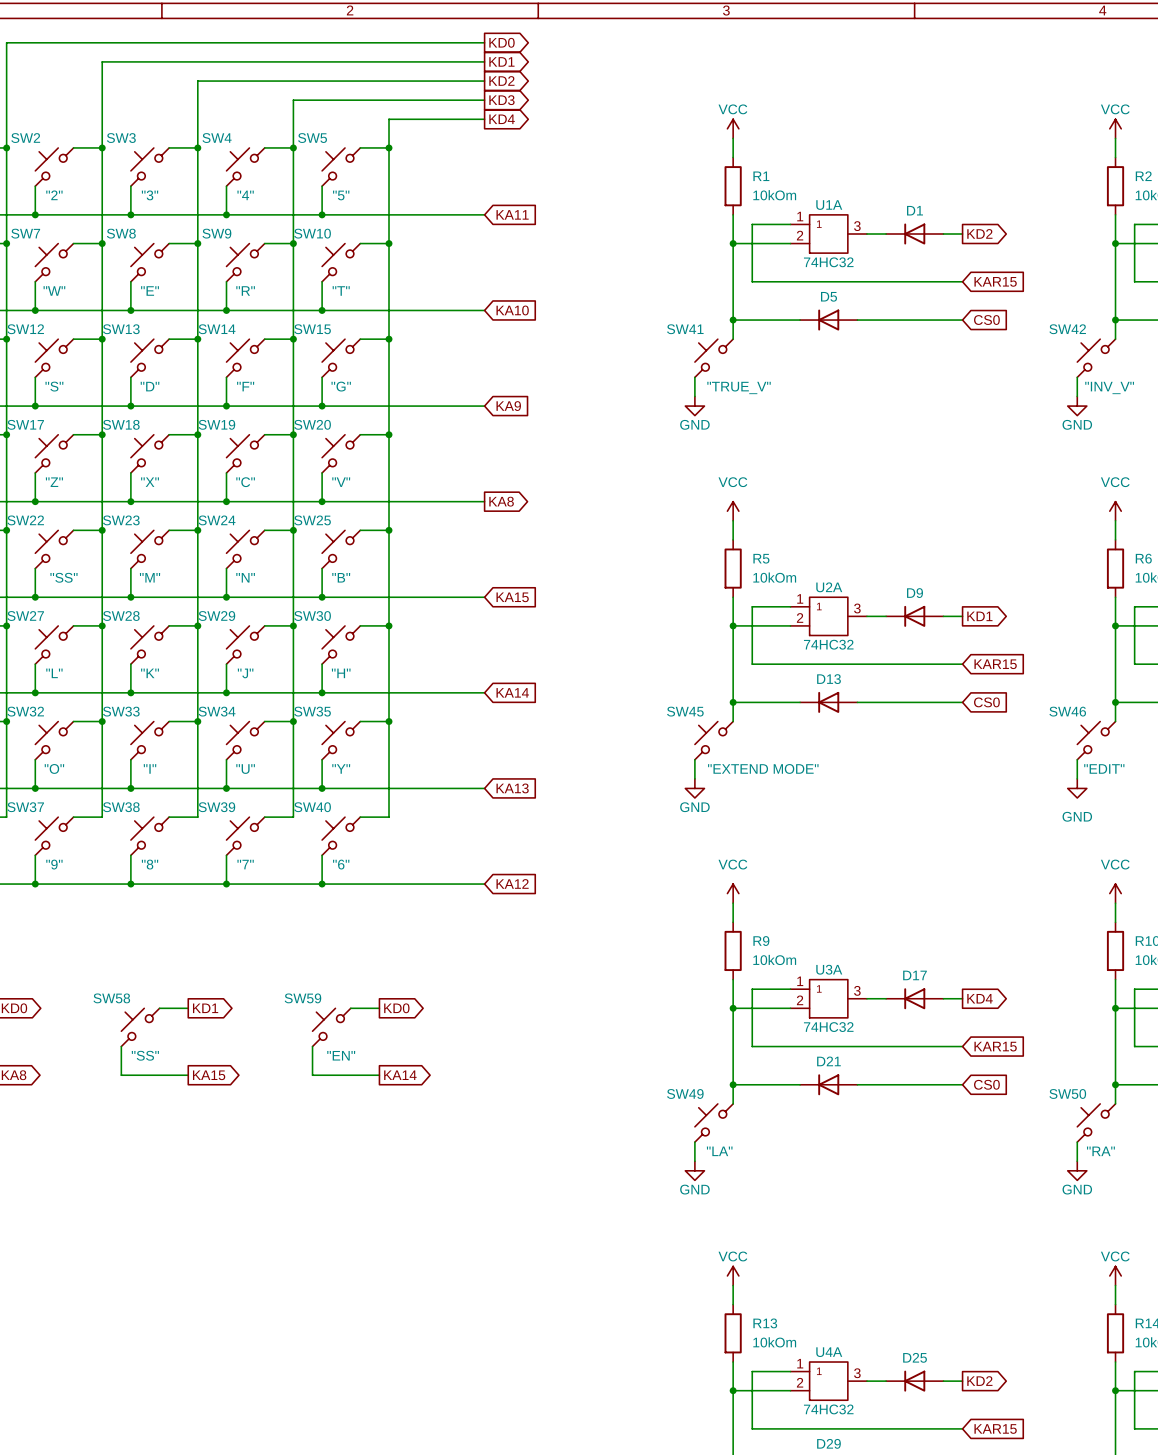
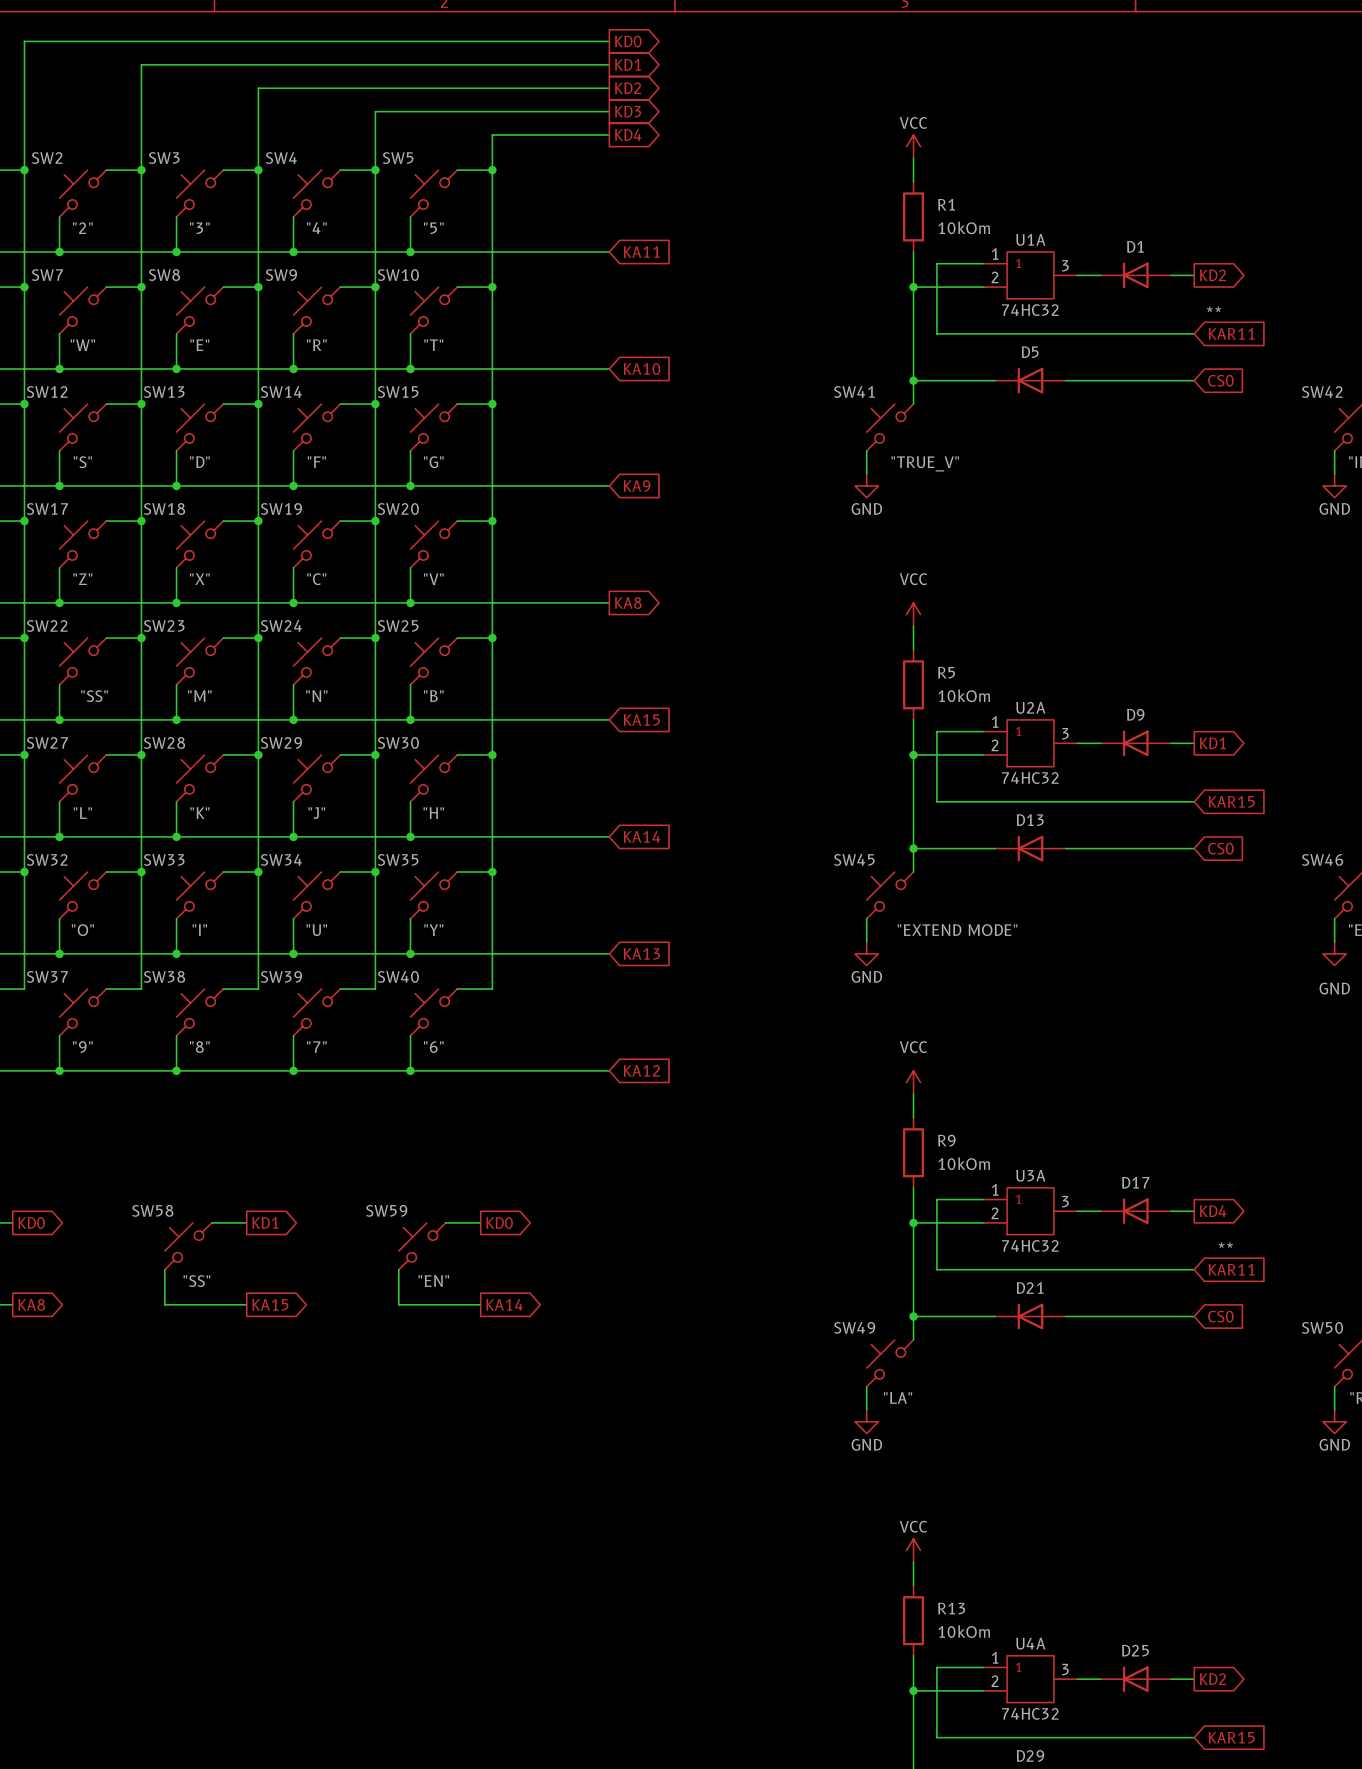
label: none -> ** (1214, 309)
global label: KAR15 (995, 281) -> KAR11 (1231, 333)
label: none -> ** (1225, 1245)
global label: KAR15 (995, 1046) -> KAR11 (1231, 1269)

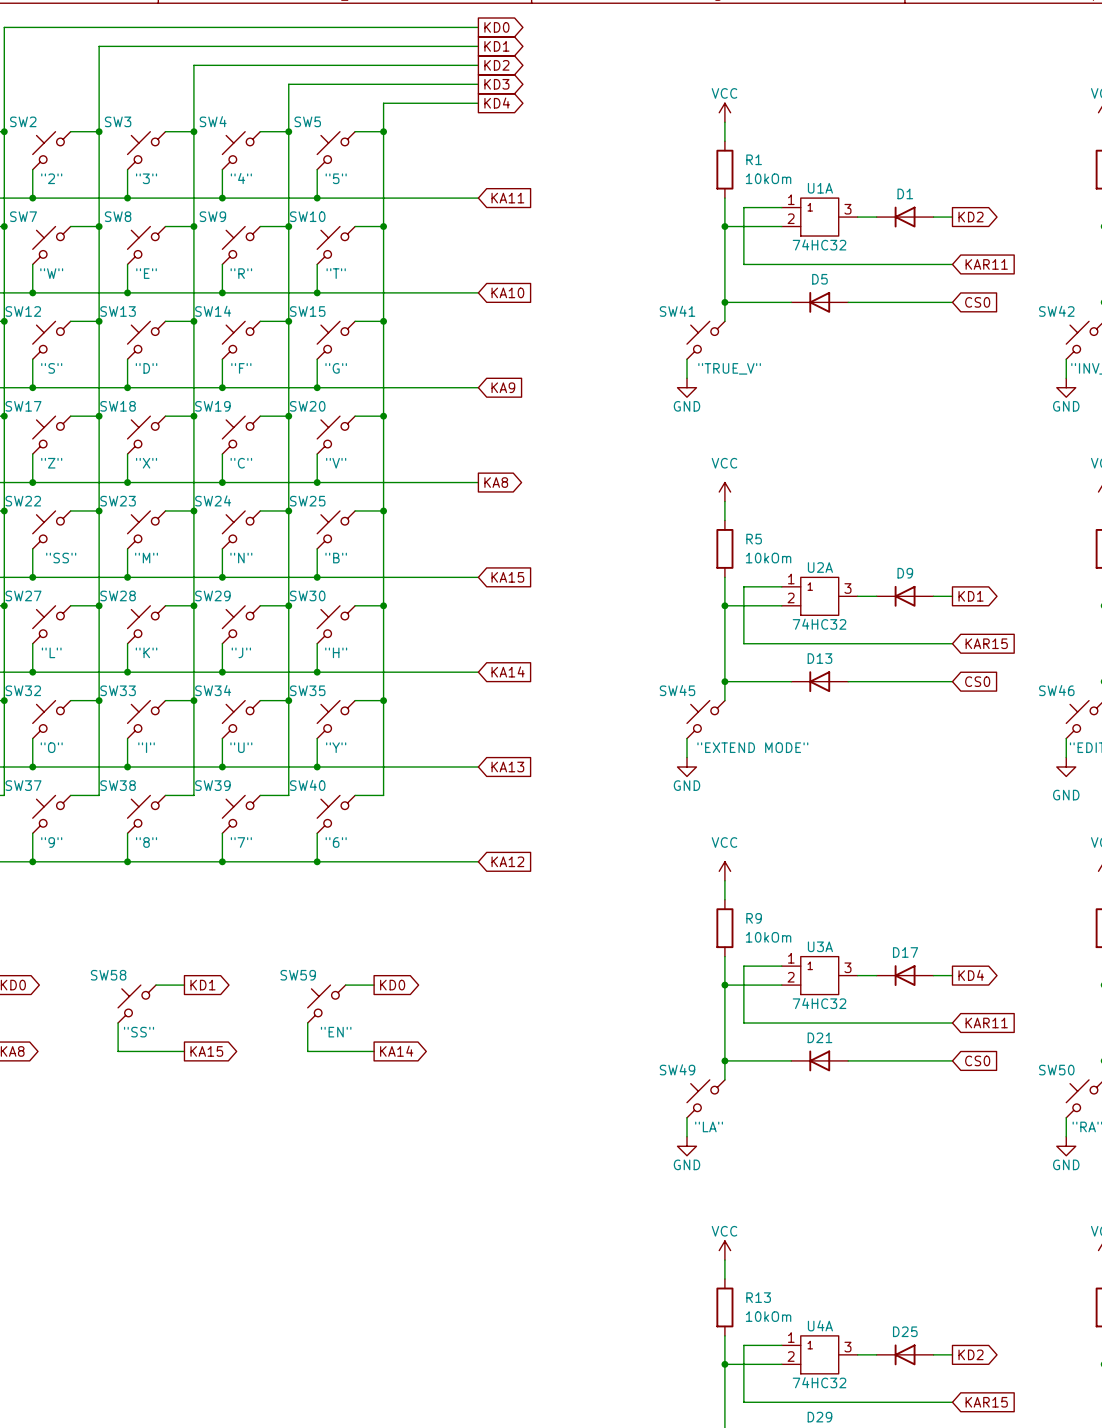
label: ** (1214, 309) -> none
label: ** (1225, 1245) -> none

